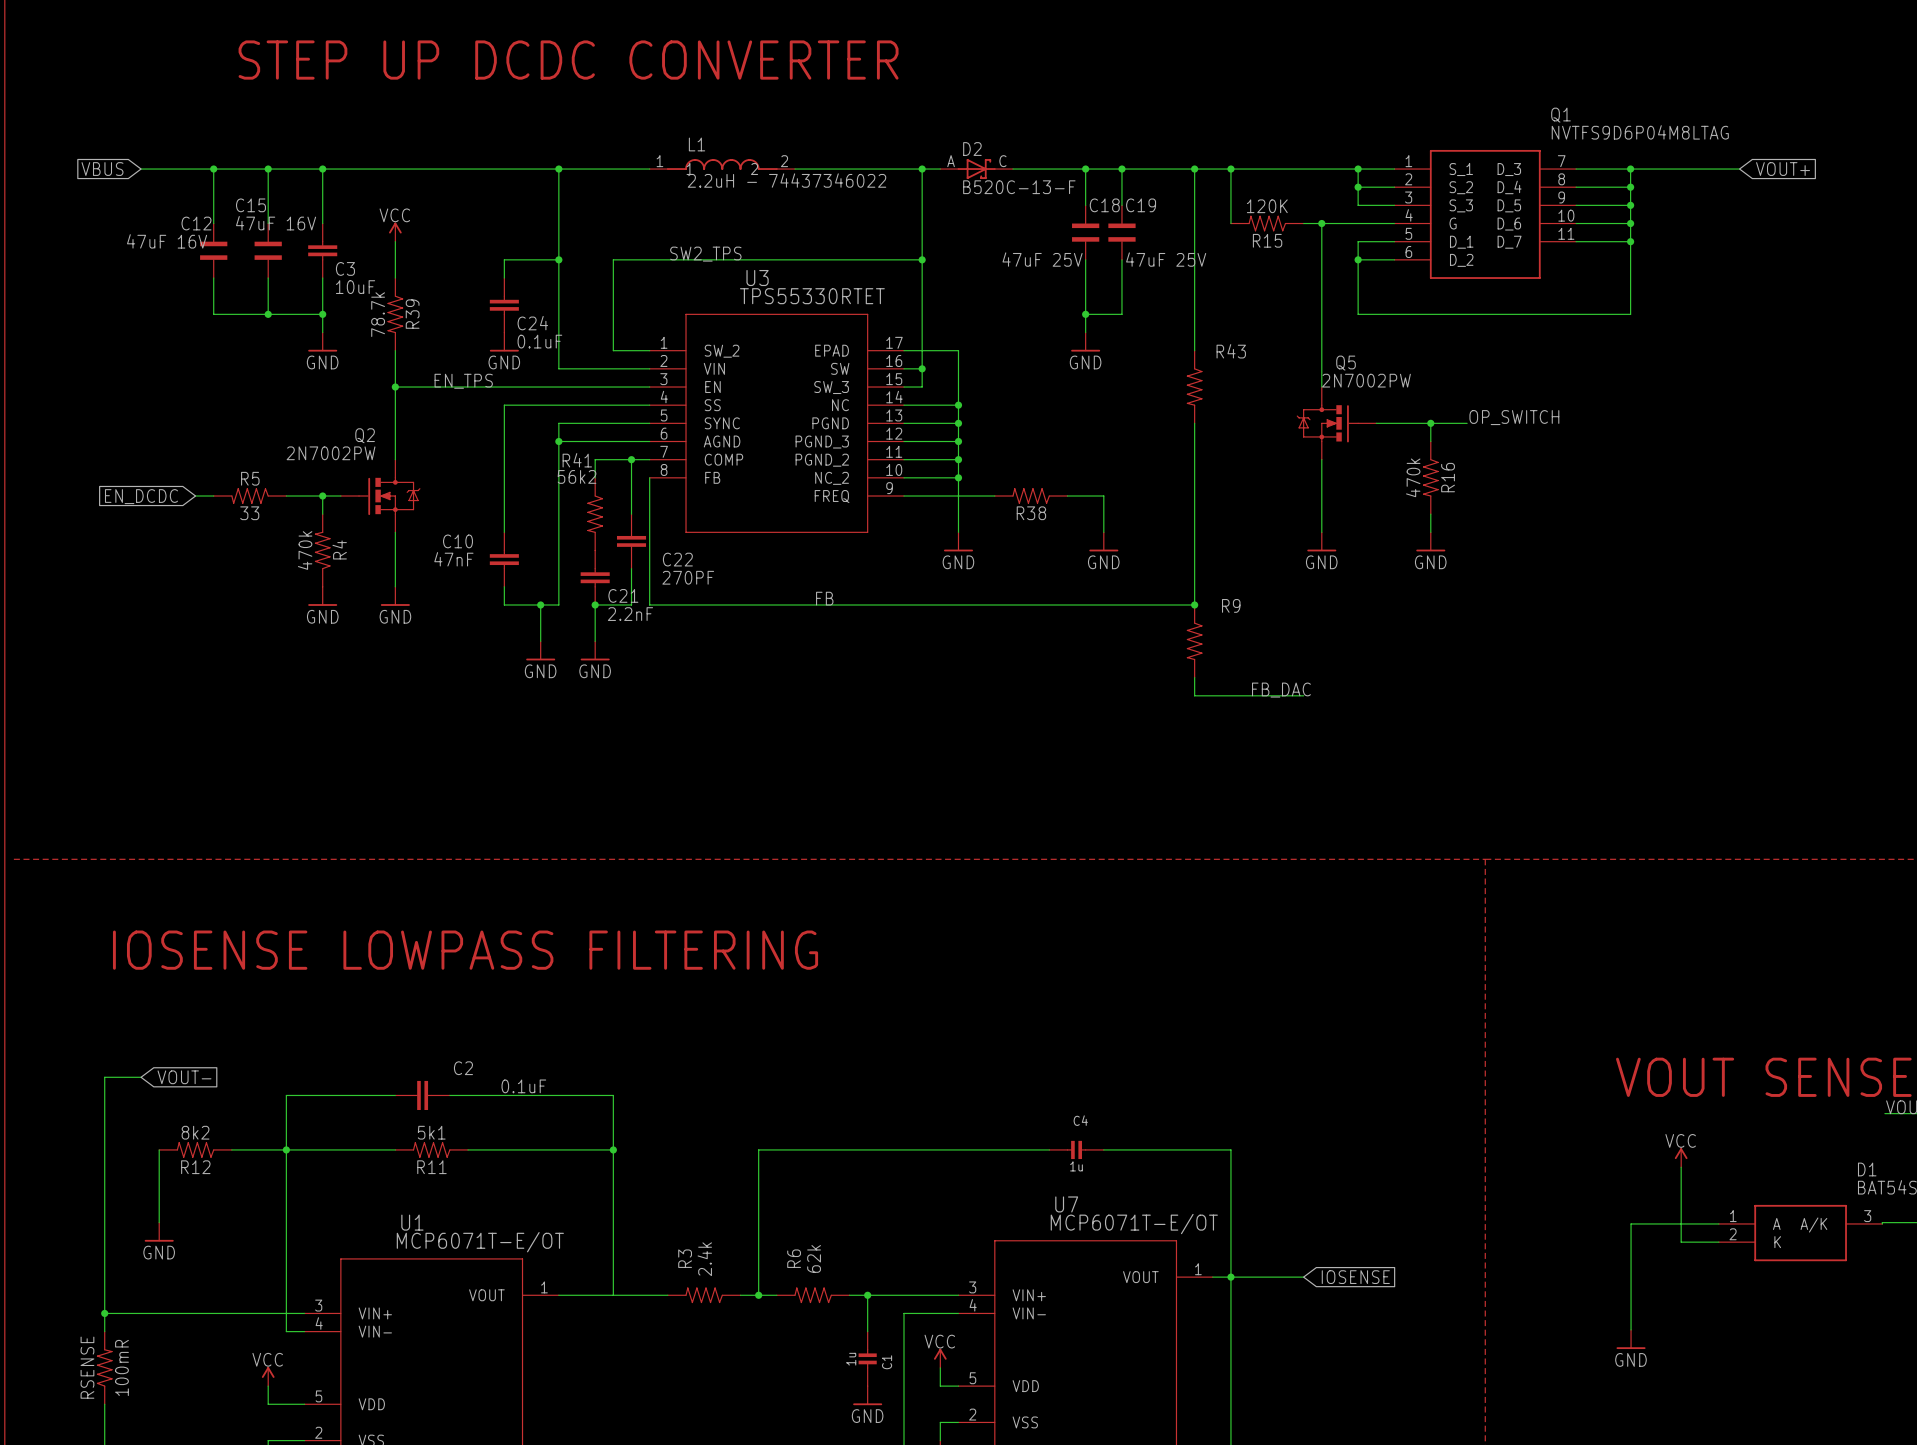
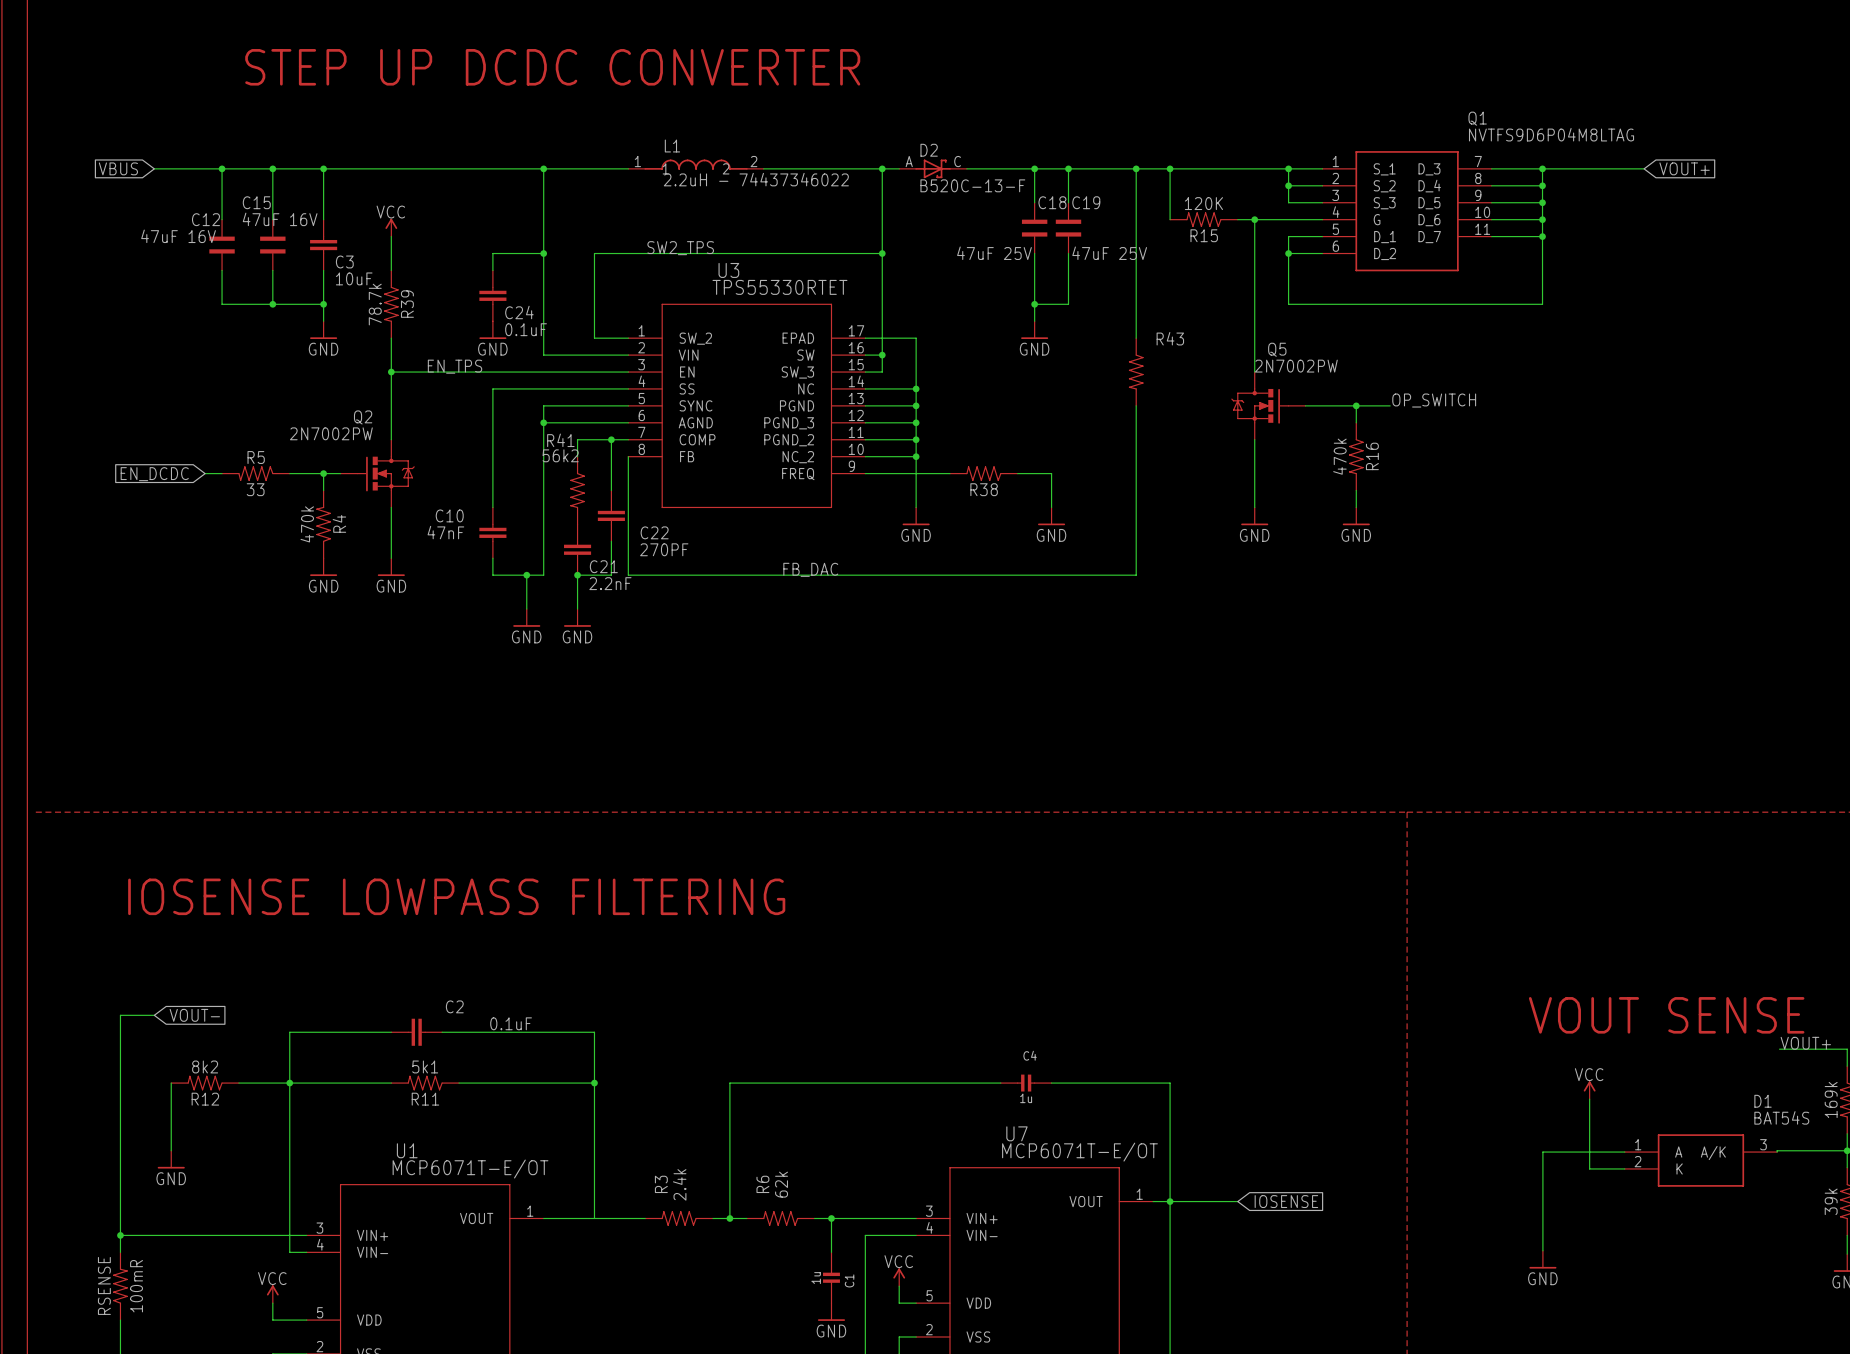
label: FB (824, 598) -> FB_DAC (810, 569)
junction: (1194, 604) -> none
R9: (1194, 641) -> none
wire: (1194, 677) (1194, 695) (1303, 695) -> none
label: FB_DAC (1281, 690) -> none

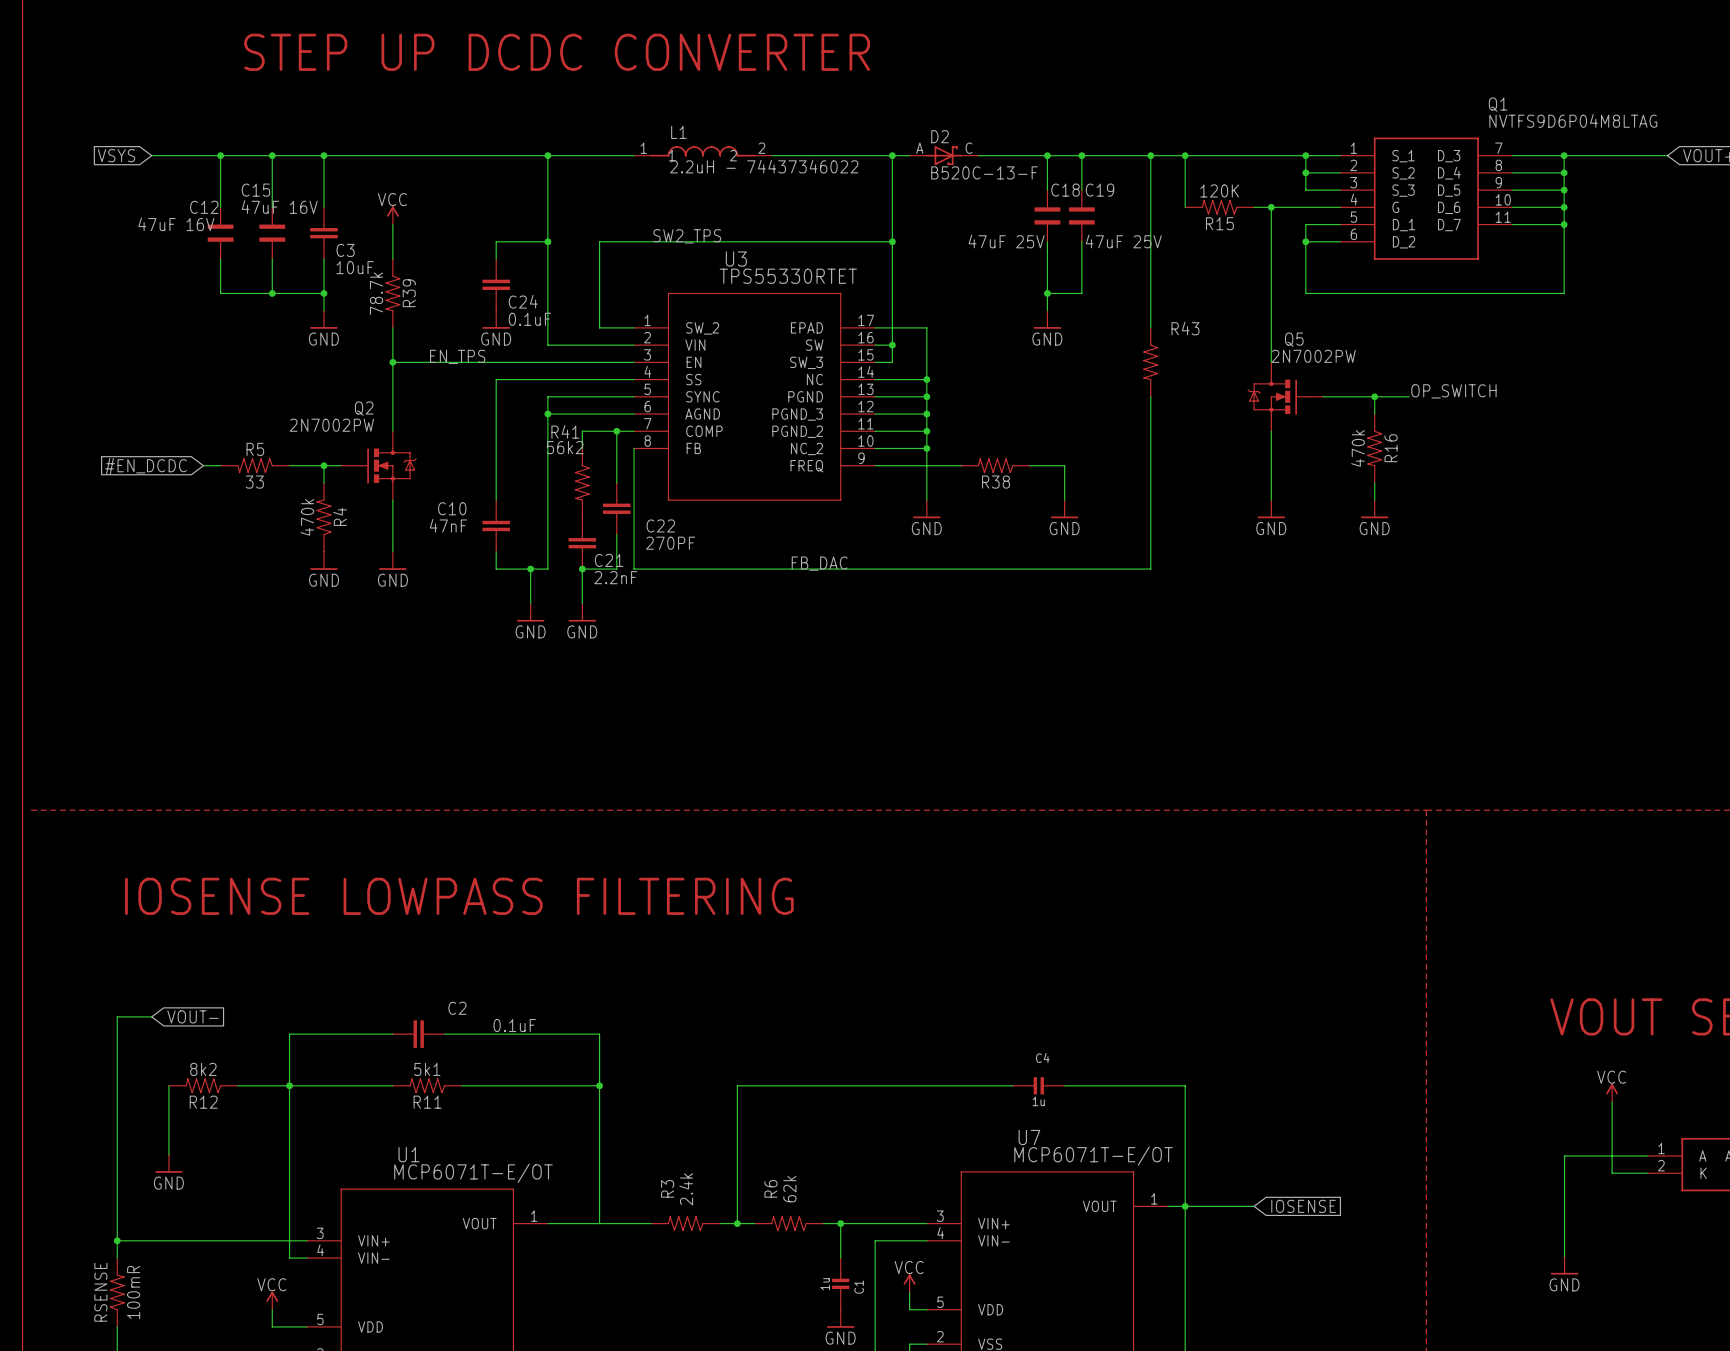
global label: VBUS (118, 168) -> VSYS (116, 155)
global label: EN_DCDC (154, 474) -> #EN_DCDC (145, 466)

